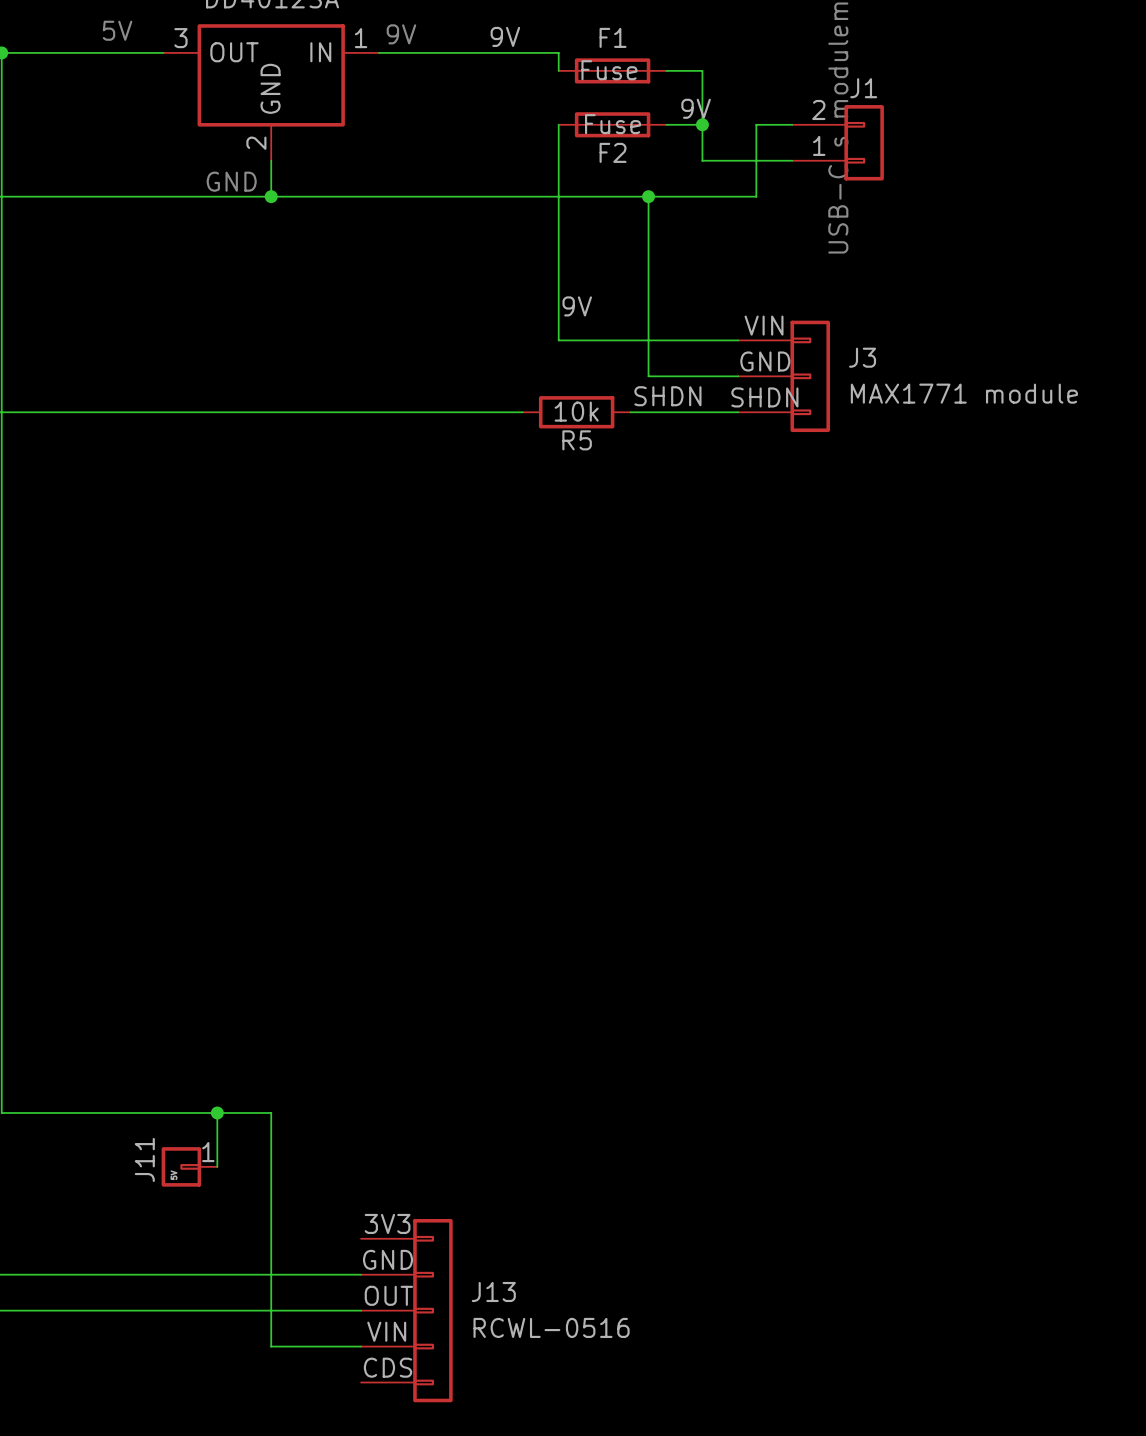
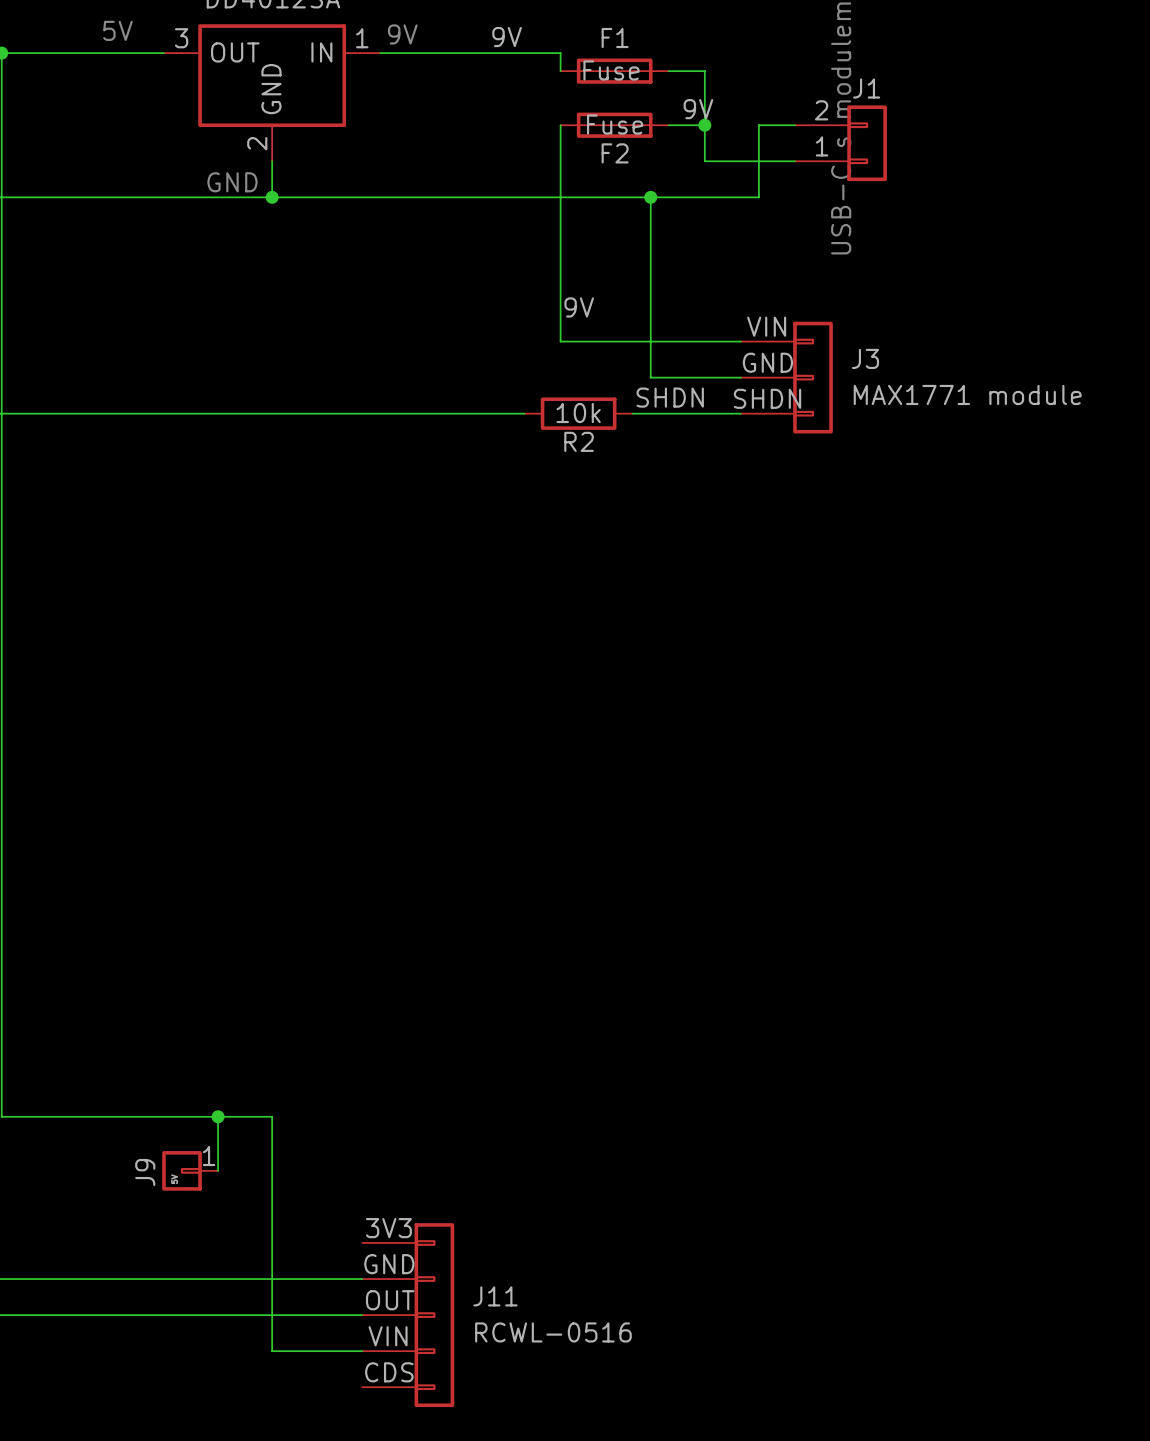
R5 name: R5 (577, 440) -> R2 (579, 441)
J11 name: J11 (144, 1159) -> J9 (145, 1172)
J13 name: J13 (493, 1291) -> J11 (495, 1296)

